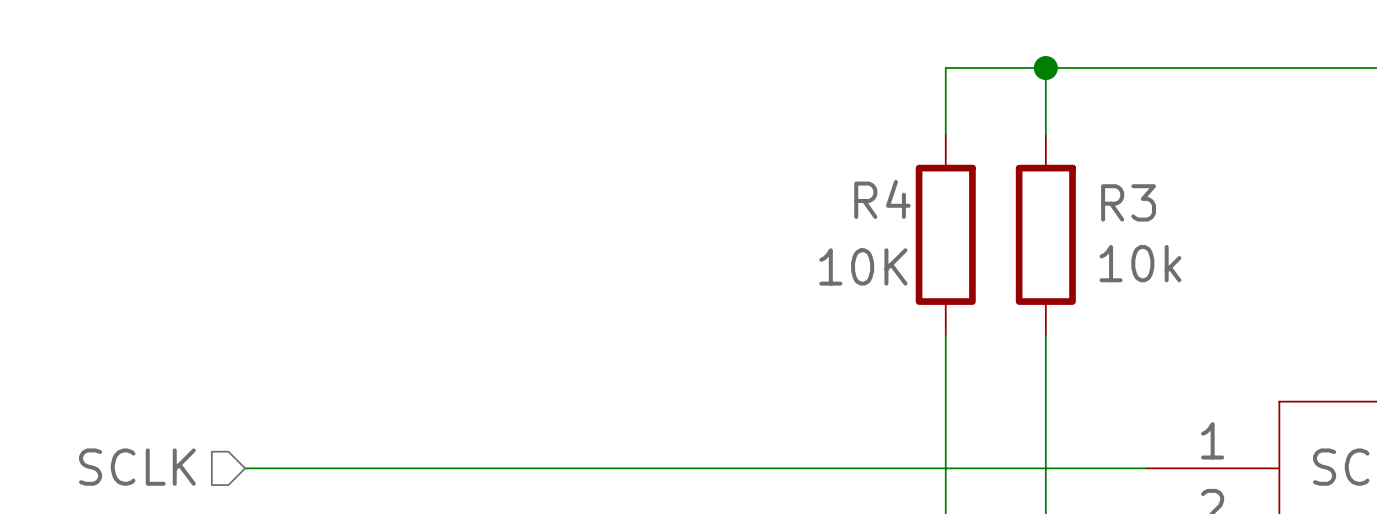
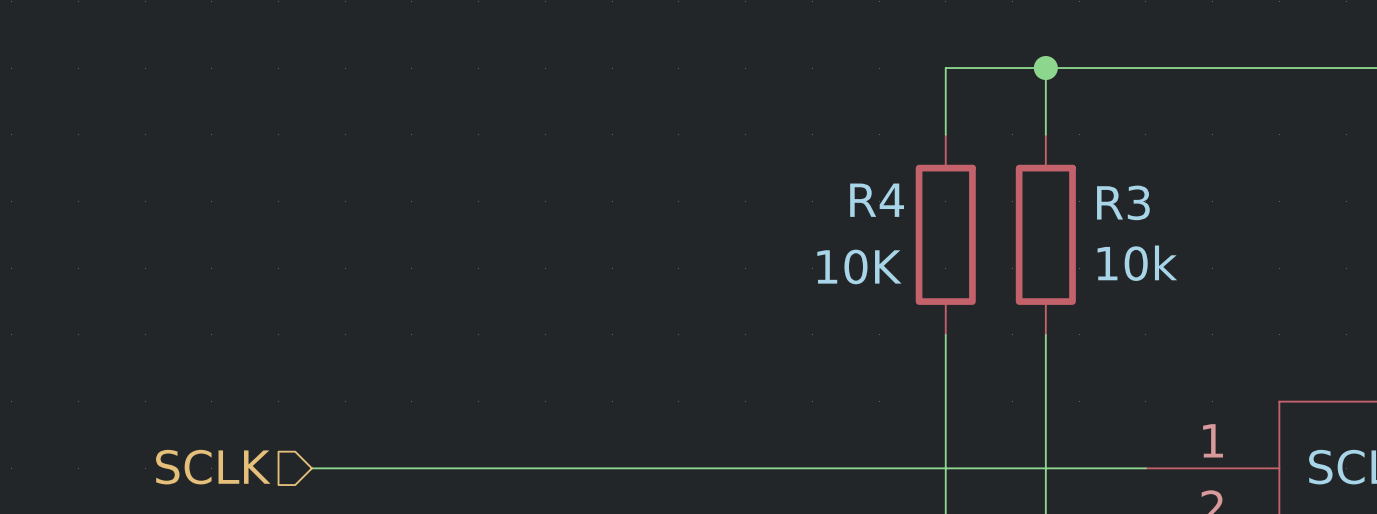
hierarchical label position: SCLK (137, 467) -> SCLK (213, 467)
wire: (245, 468) (311, 468) -> none

